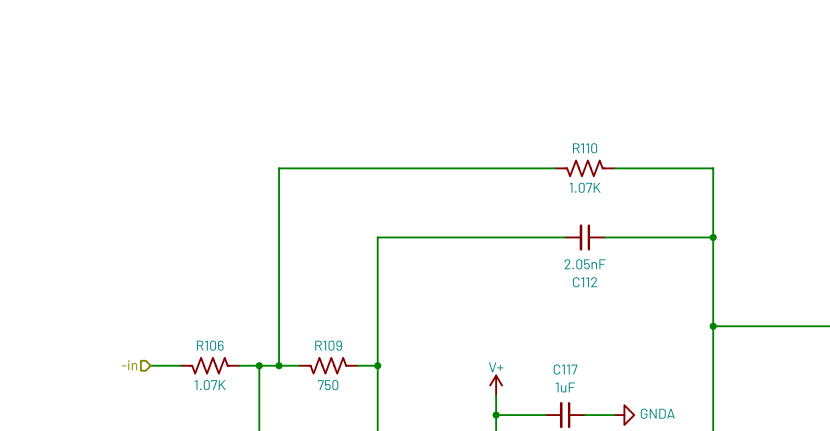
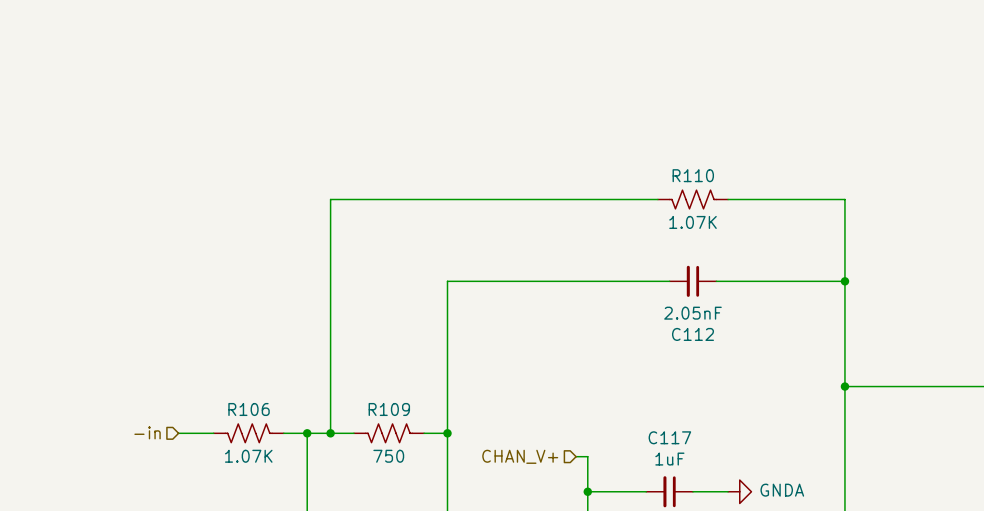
hierarchical label: none -> CHAN_V+ (520, 456)
power symbol: V+ (496, 385) -> none

